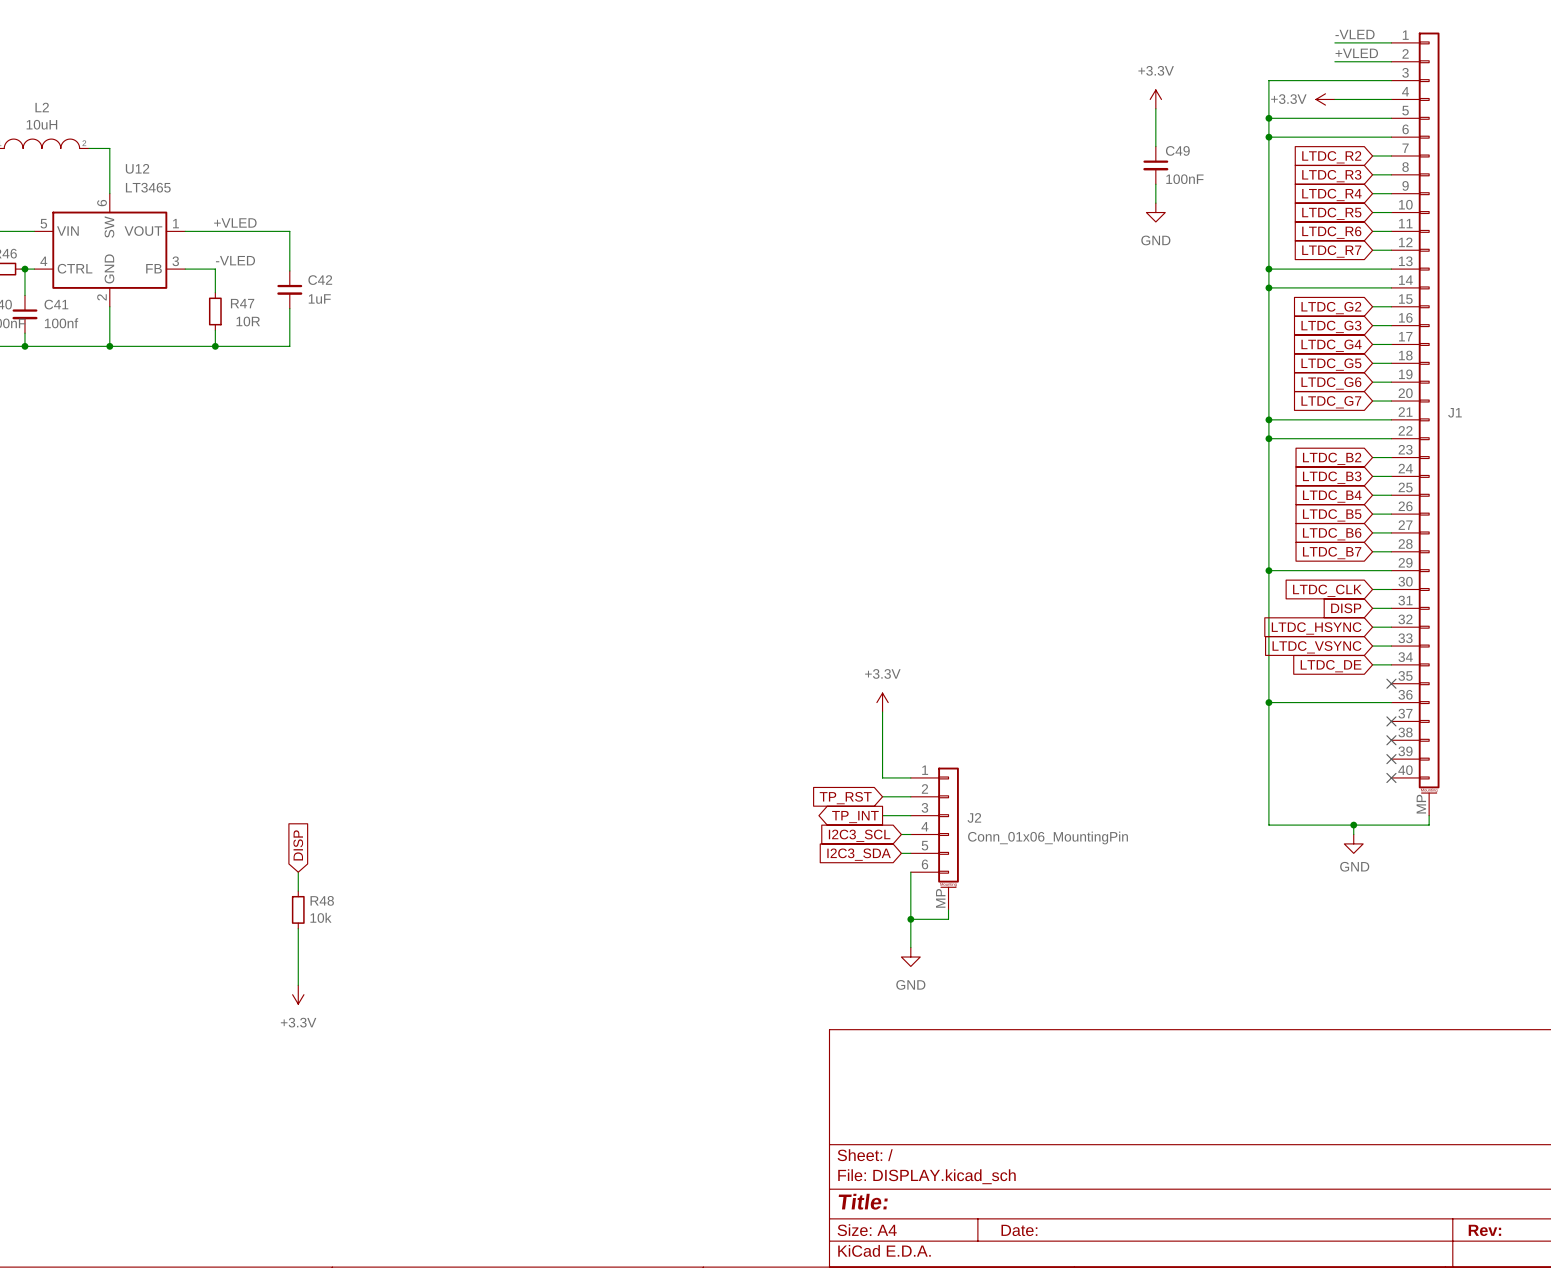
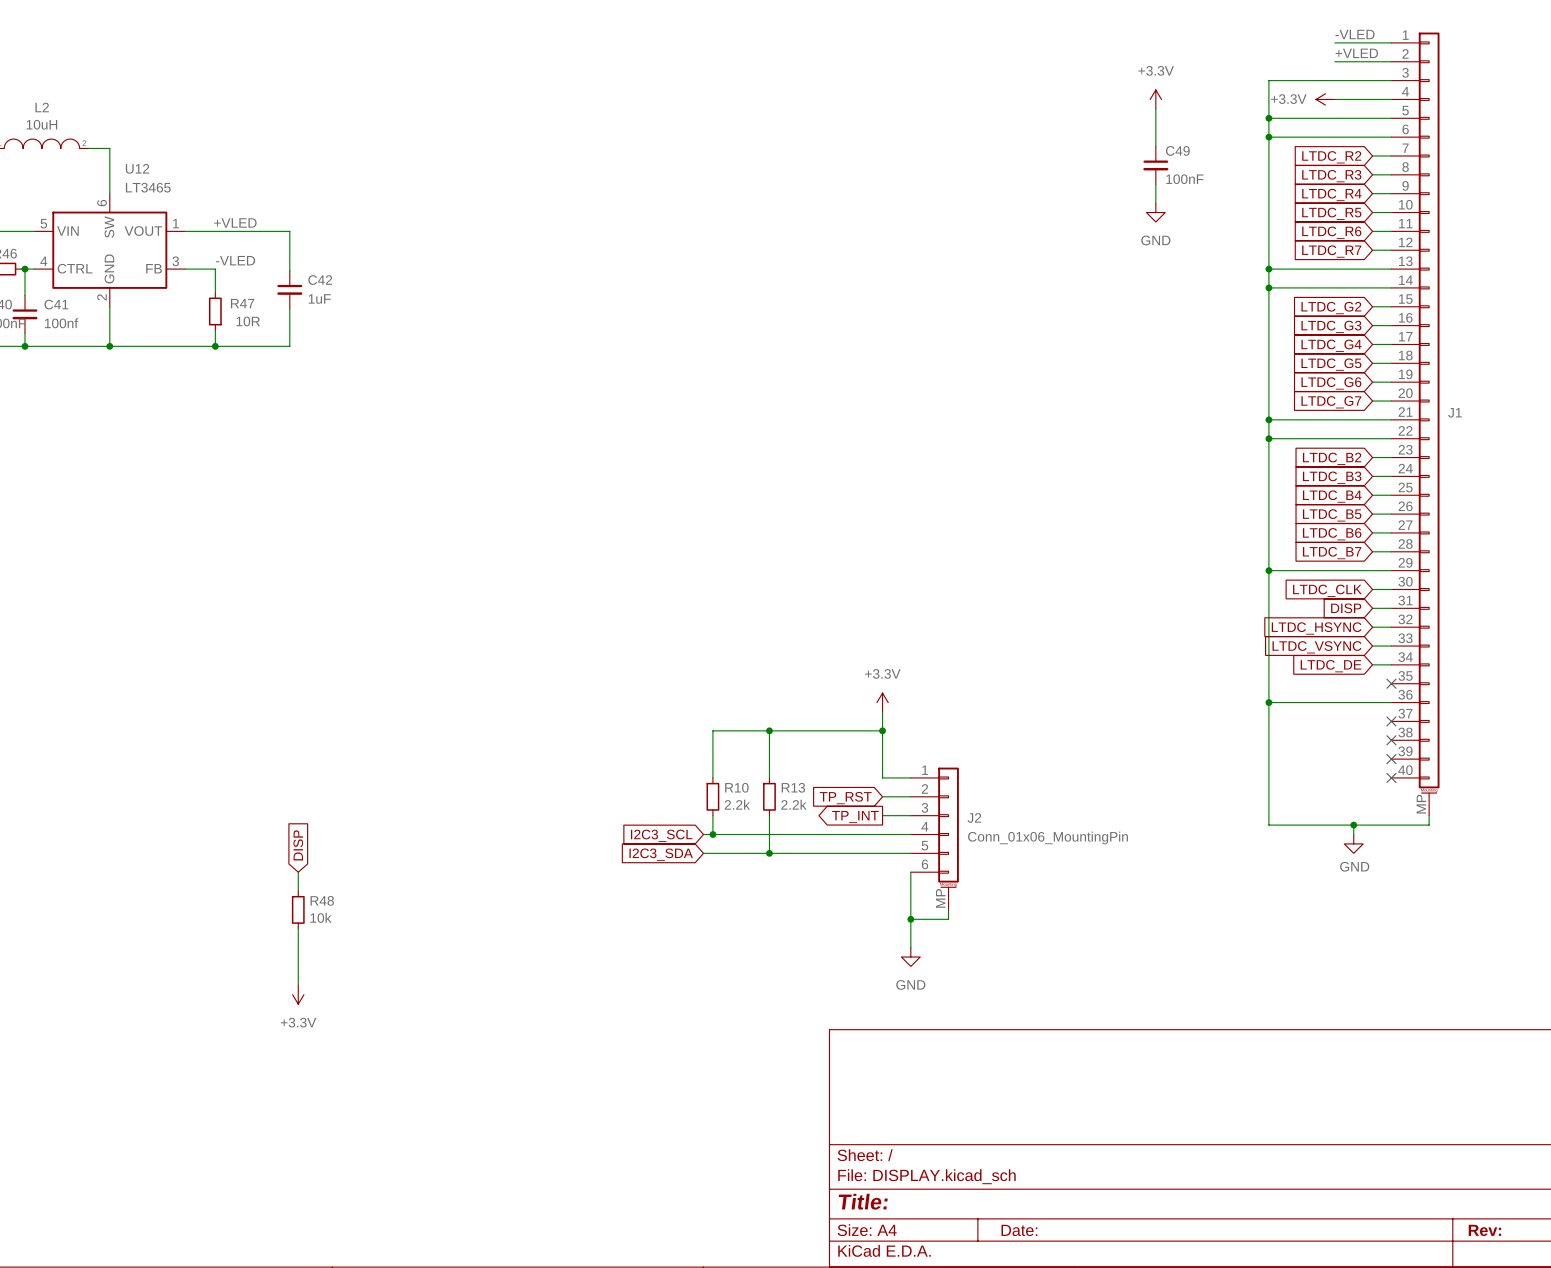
wire: none -> (769, 730) (769, 777)
junction: none -> (769, 730)
wire: none -> (882, 730) (712, 730) (712, 777)
junction: none -> (882, 730)
R10: none -> 2.2k (712, 796)
R13: none -> 2.2k (769, 796)
wire: none -> (712, 815) (712, 834)
wire: none -> (769, 815) (769, 853)
wire: none -> (703, 834) (901, 834)
junction: none -> (712, 834)
global label: none -> I2C3_SCL (661, 835)
global label: I2C3_SCL (859, 835) -> none
wire: none -> (703, 853) (901, 853)
junction: none -> (769, 853)
global label: none -> I2C3_SDA (661, 854)
global label: I2C3_SDA (859, 854) -> none

